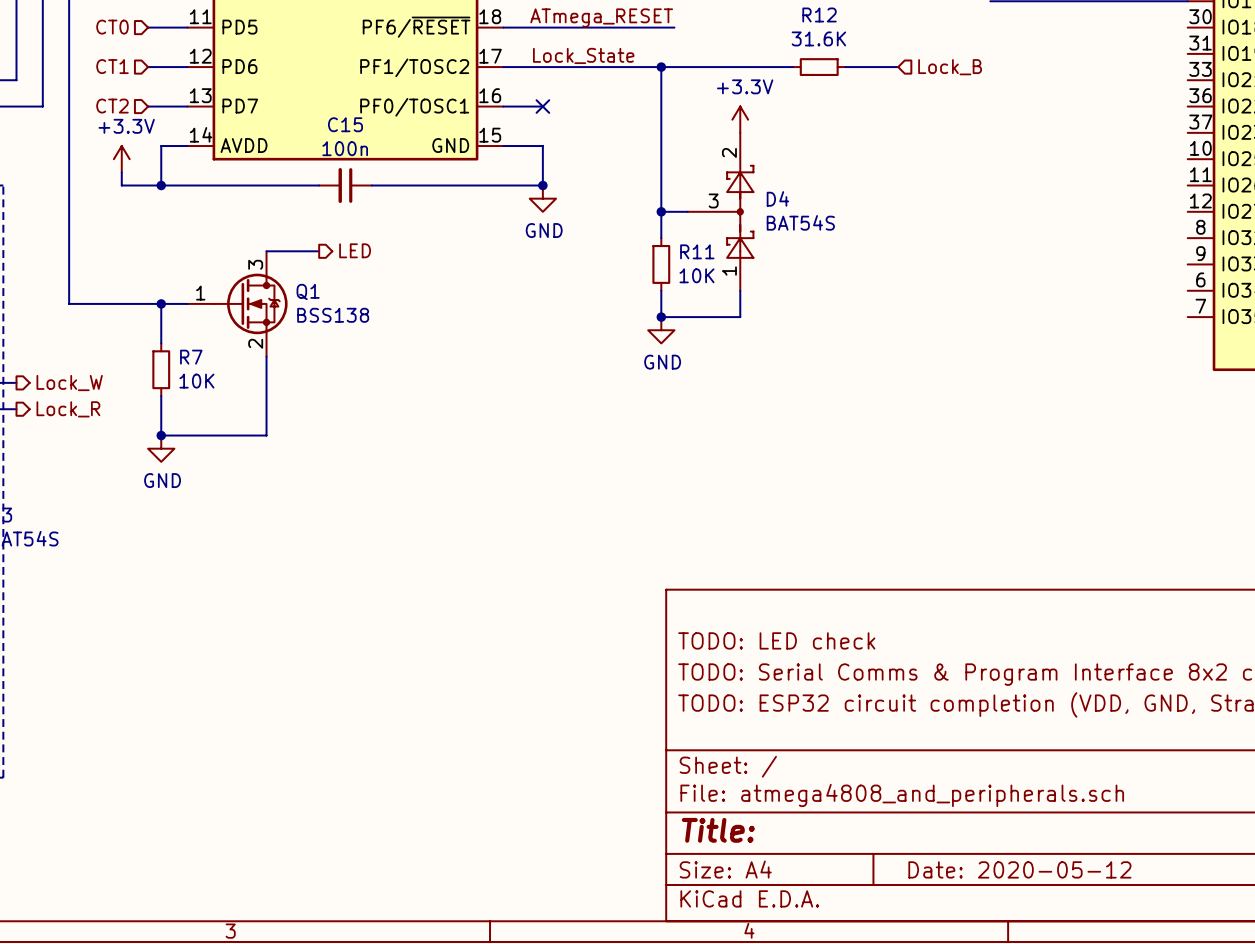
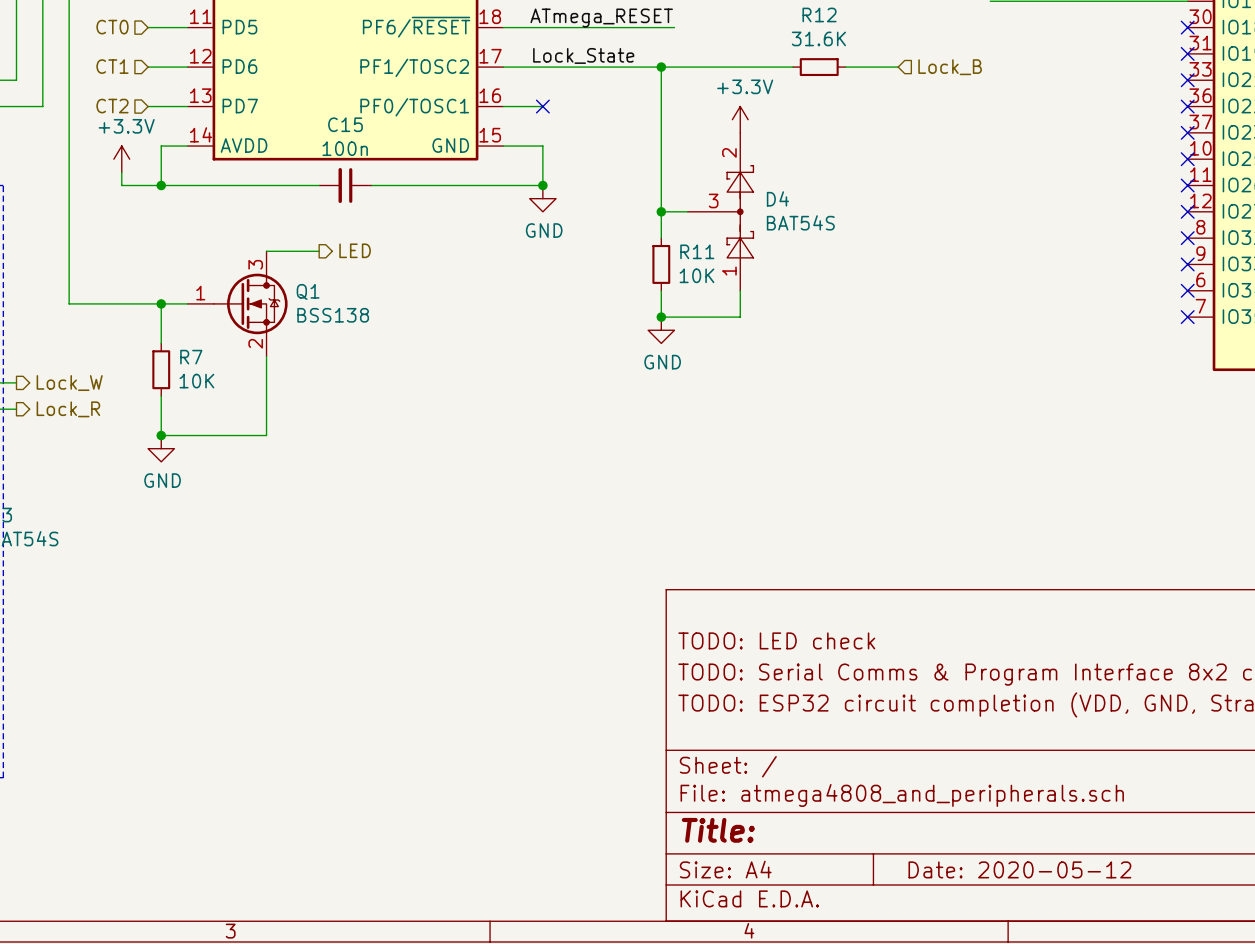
no-connect mark: none -> (1187, 27)
no-connect mark: none -> (1187, 53)
no-connect mark: none -> (1187, 80)
no-connect mark: none -> (1187, 106)
no-connect mark: none -> (1187, 132)
no-connect mark: none -> (1187, 159)
no-connect mark: none -> (1187, 185)
no-connect mark: none -> (1187, 211)
no-connect mark: none -> (1187, 238)
no-connect mark: none -> (1187, 264)
no-connect mark: none -> (1187, 290)
no-connect mark: none -> (1187, 317)

